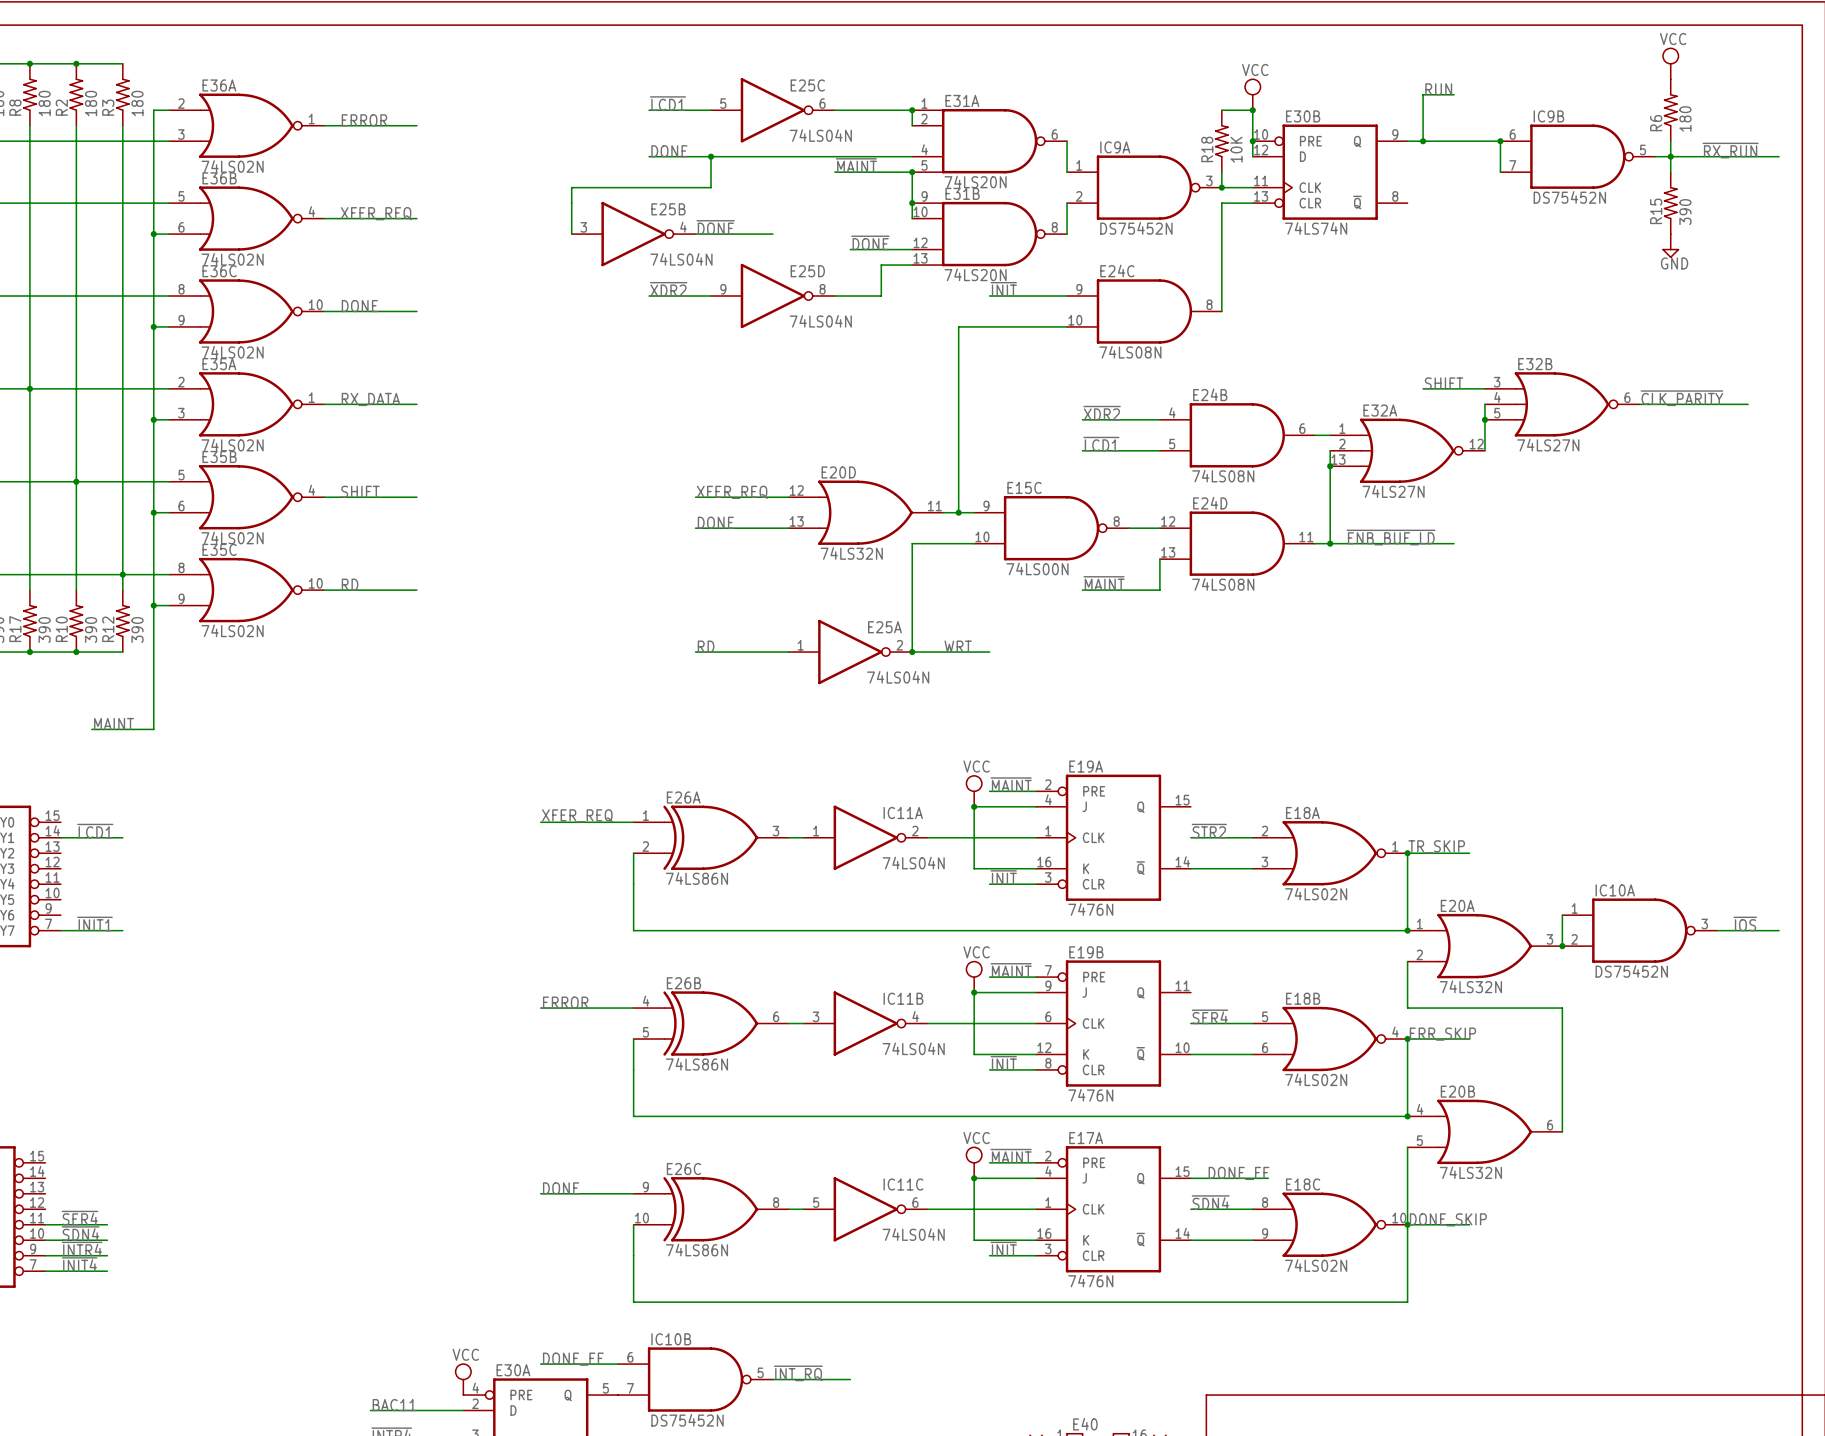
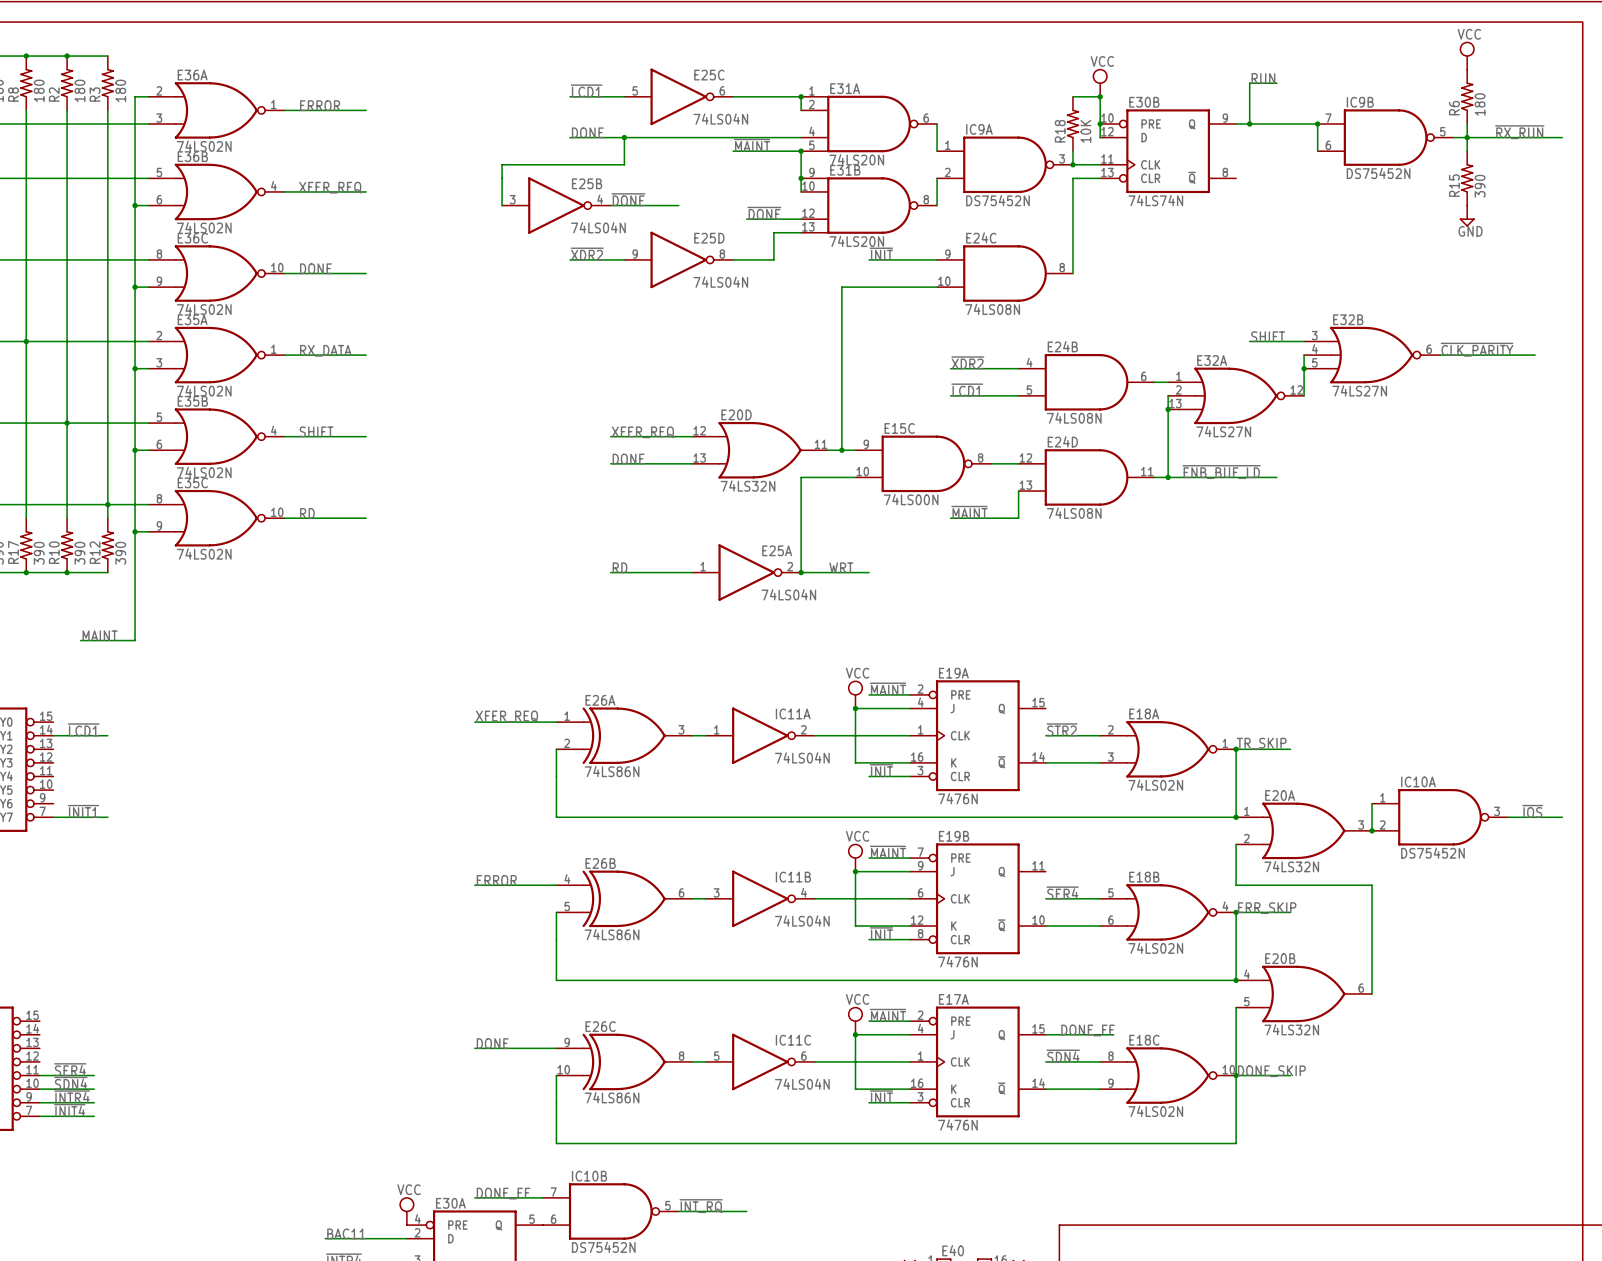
IC9B flip: as is (1577, 156) -> up-down (1385, 137)
IC10B flip: as is (695, 1379) -> up-down (610, 1211)

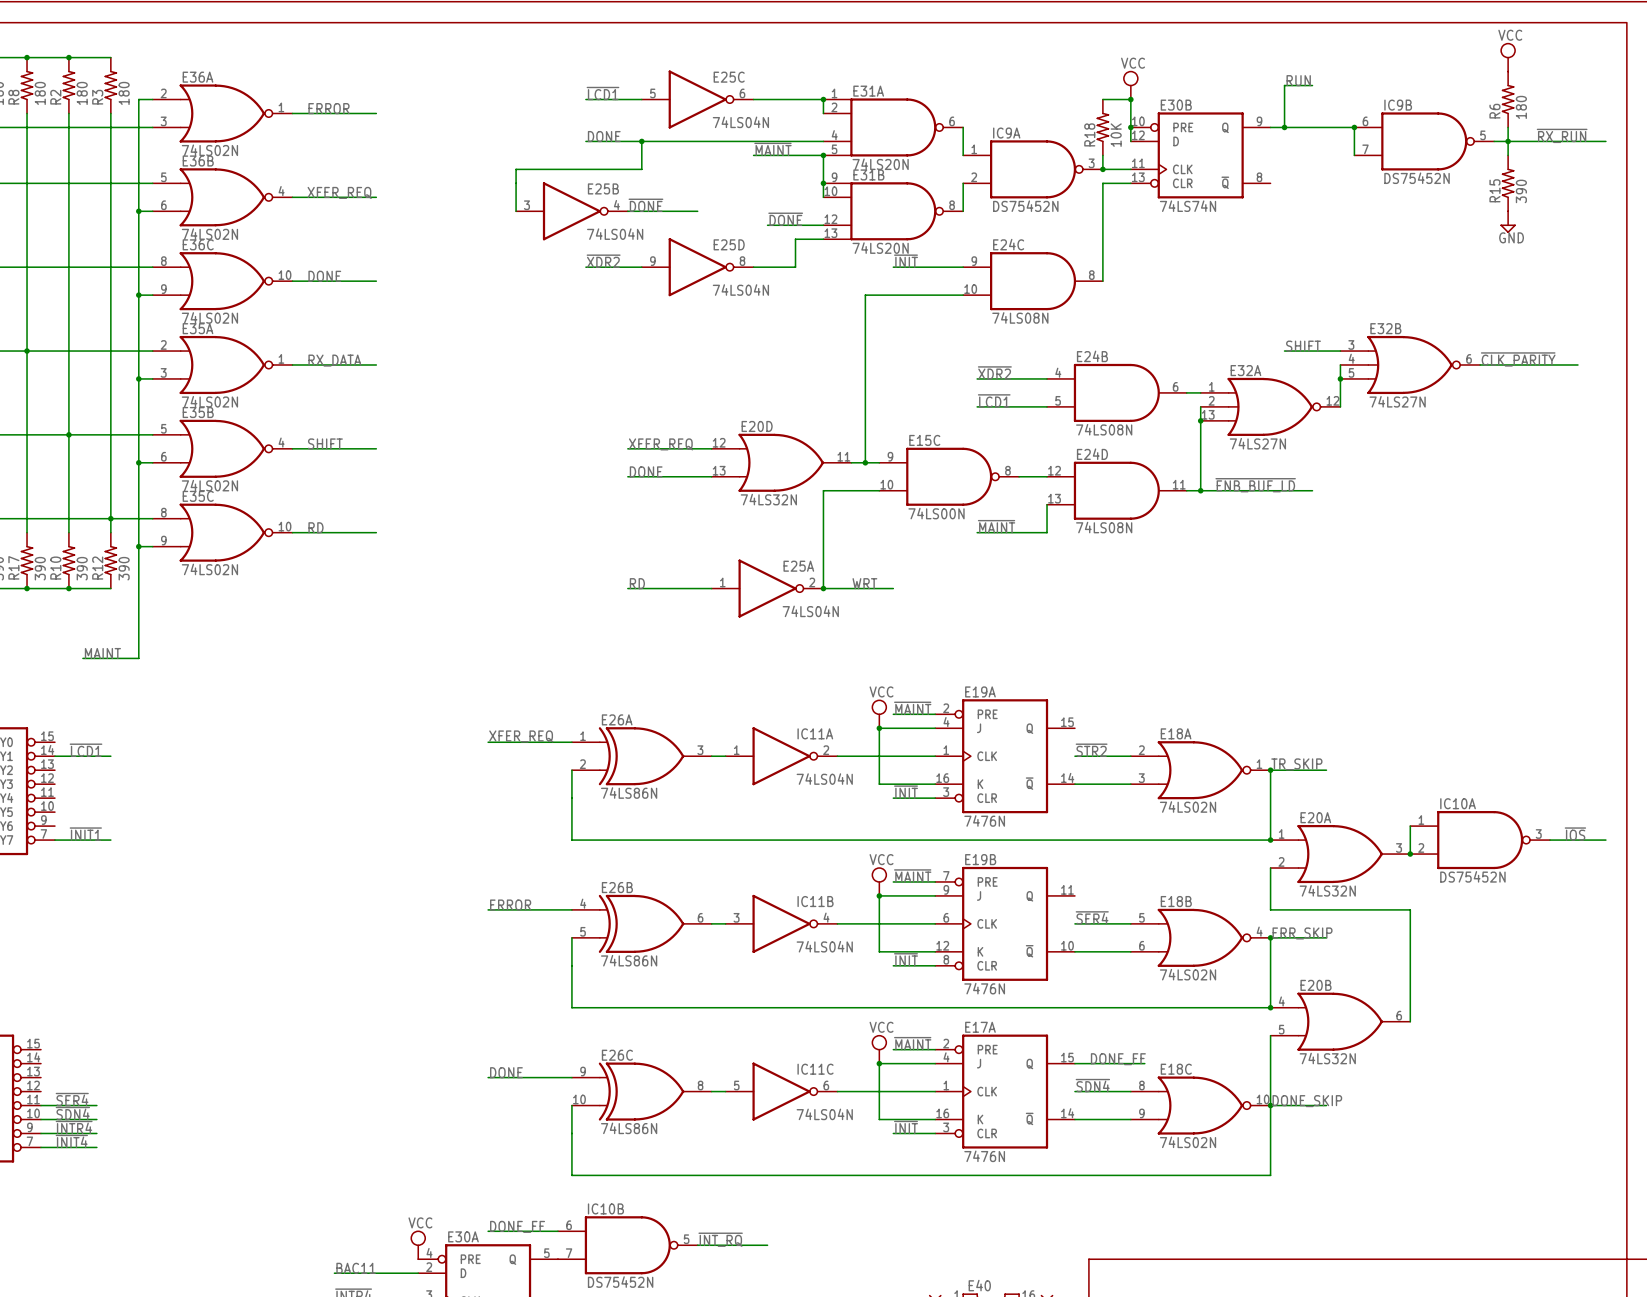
IC9B flip: as is (1385, 137) -> up-down (1424, 141)
IC10B flip: as is (610, 1211) -> up-down (627, 1245)

